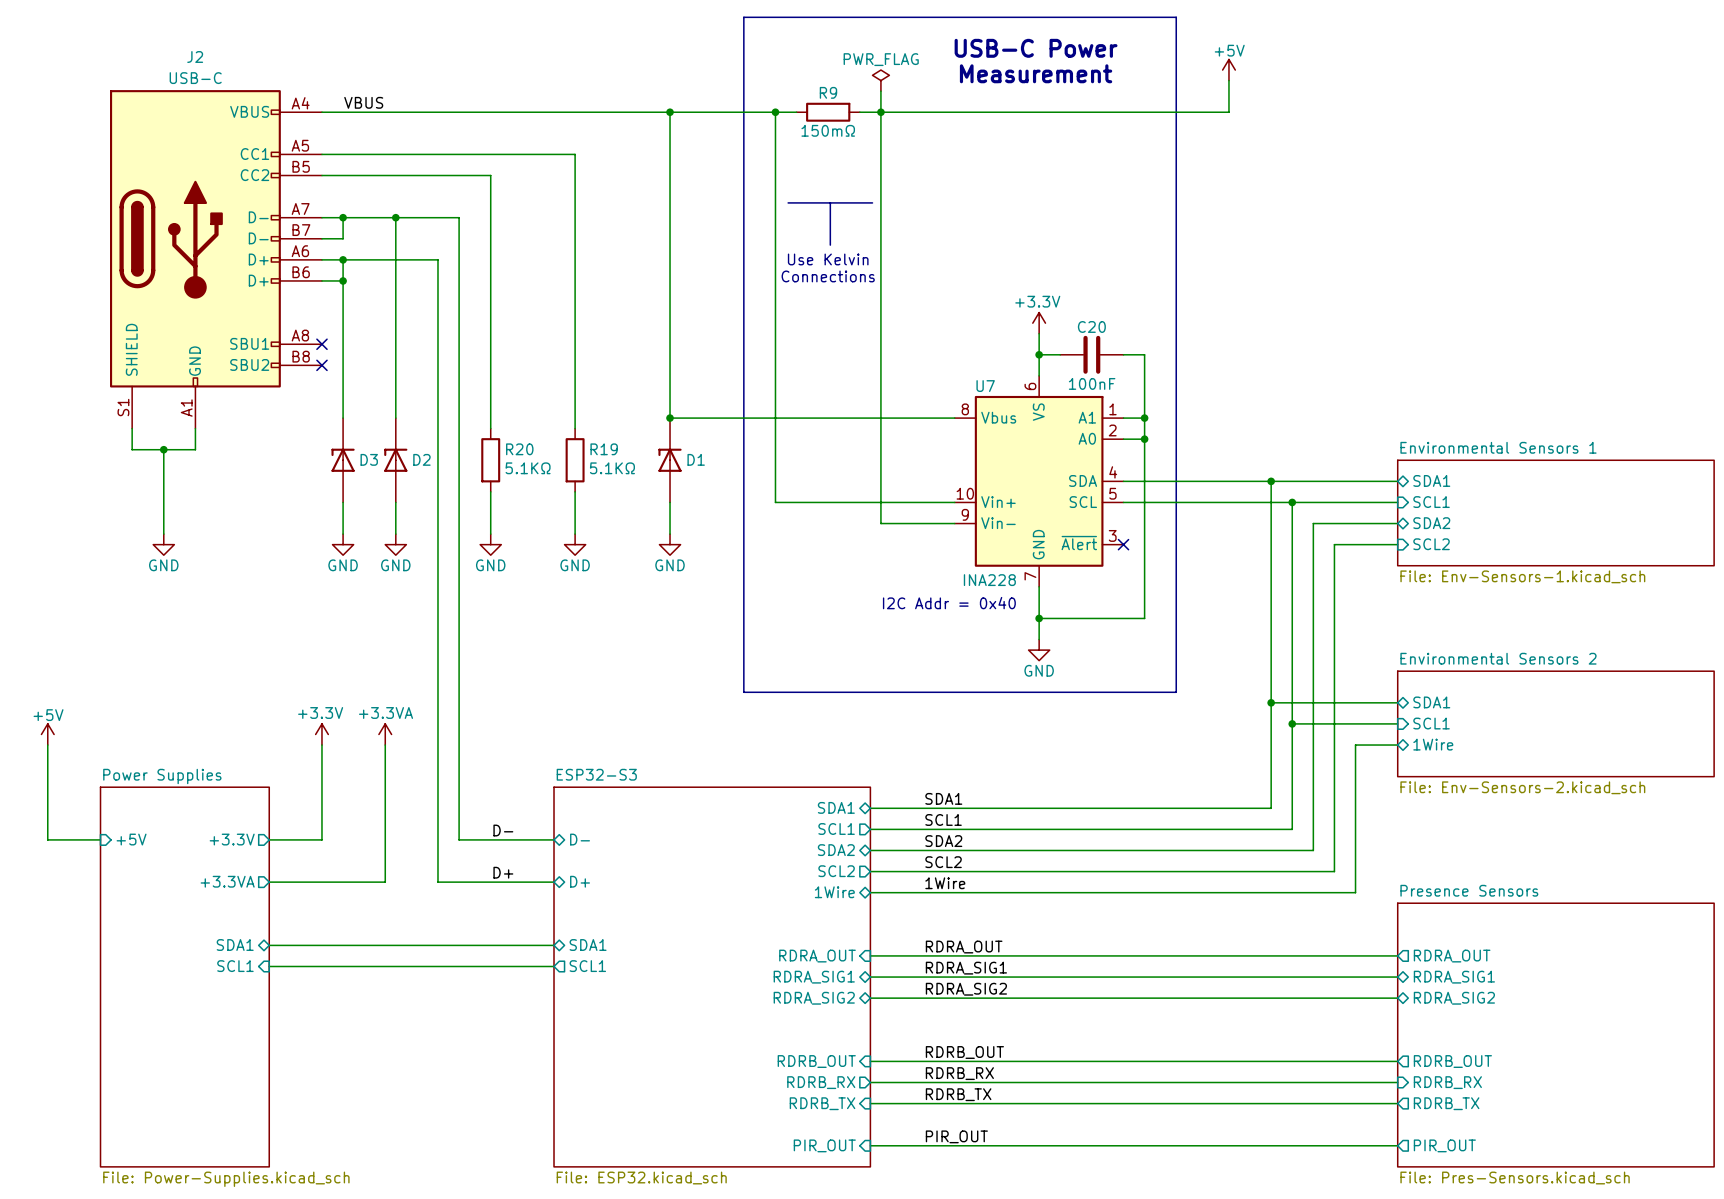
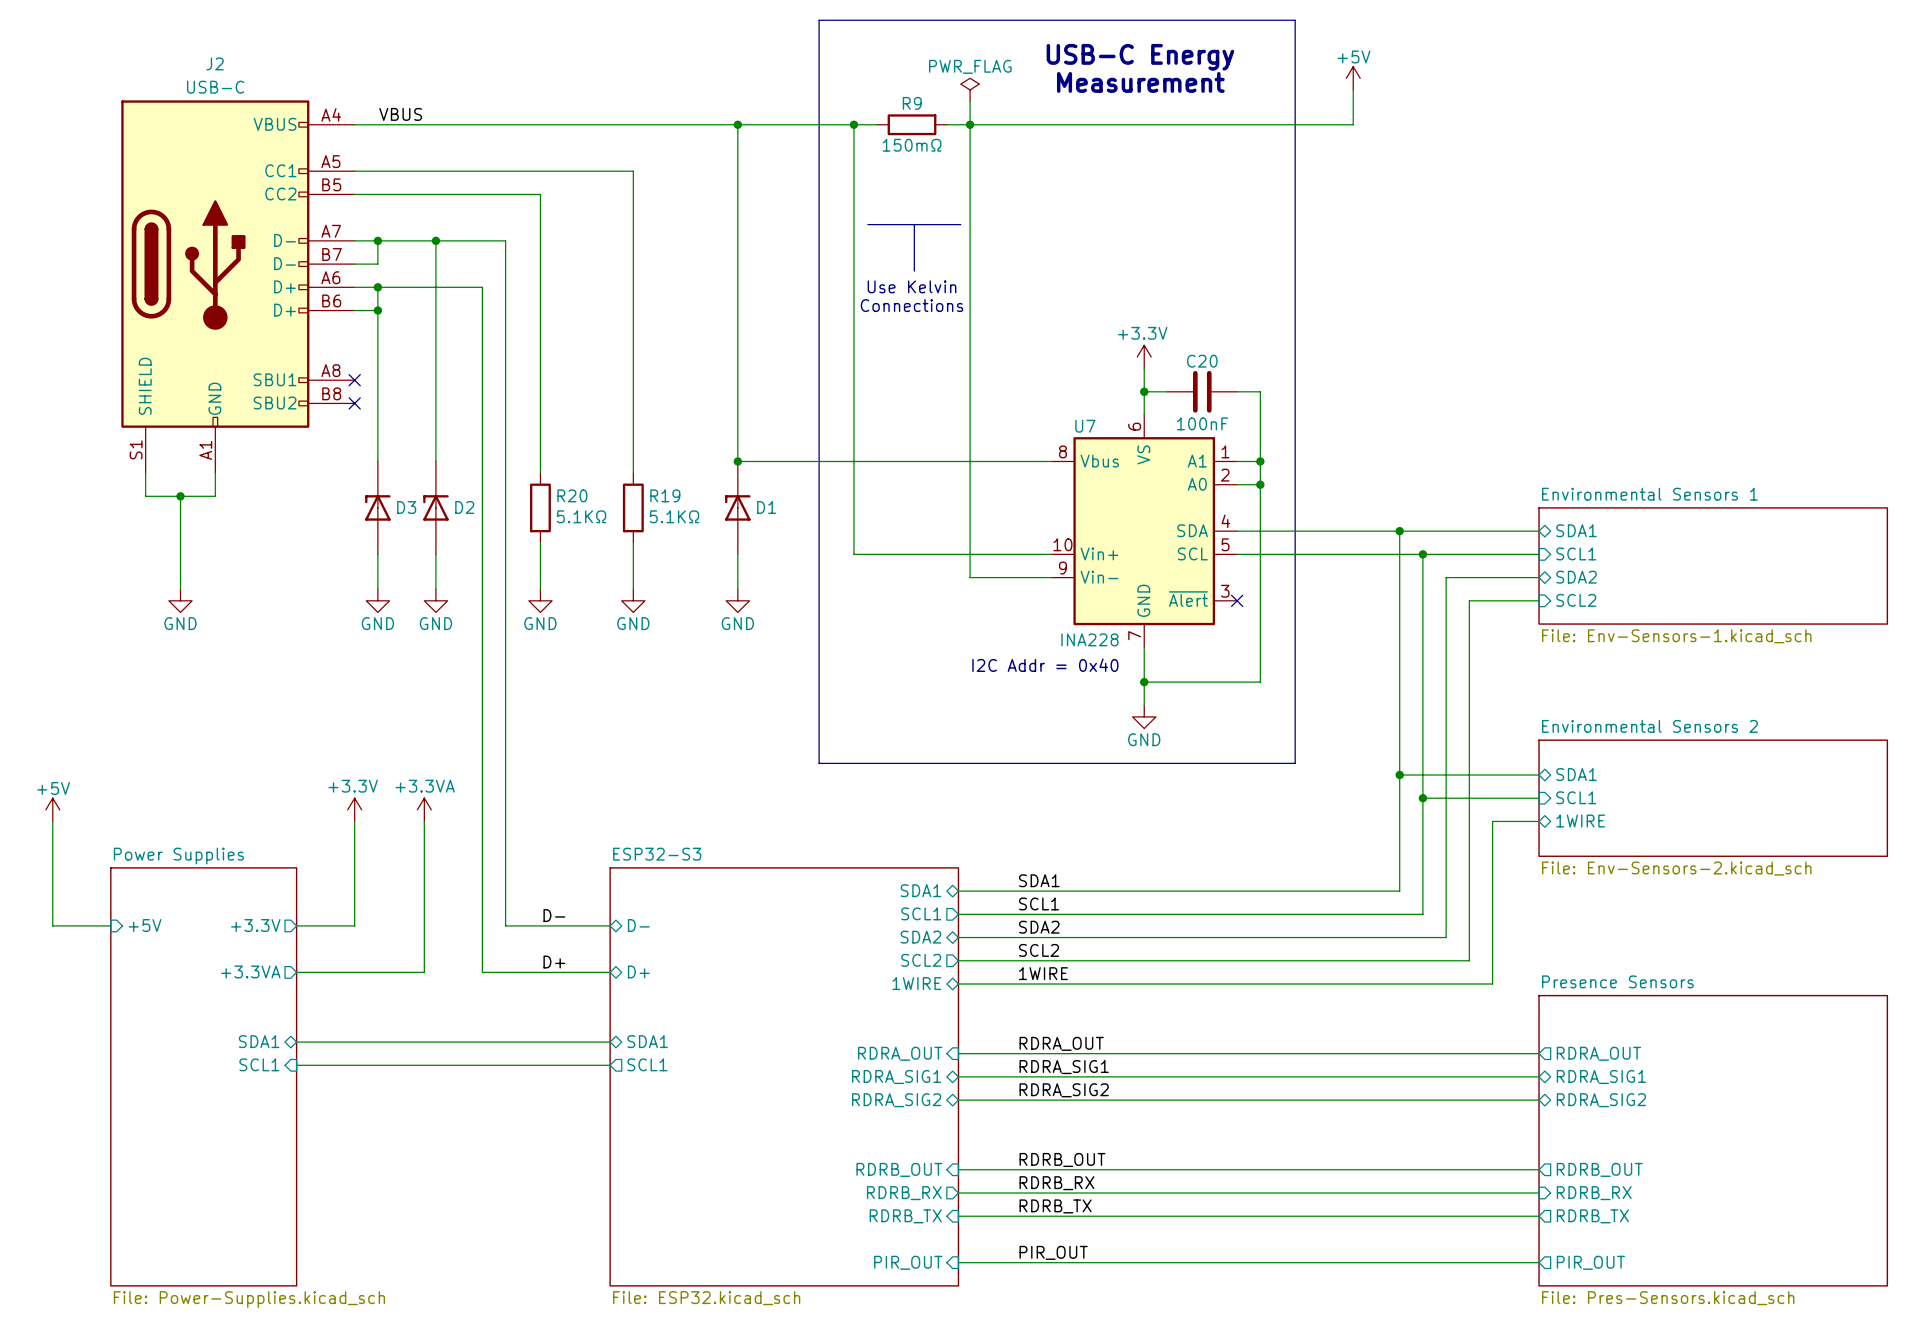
text: USB-C Power (1036, 48) -> USB-C Energy (1140, 57)
sheet pin: 1Wire (1433, 744) -> 1WIRE (1580, 821)
label: 1Wire (945, 883) -> 1WIRE (1043, 973)
sheet pin: 1Wire (834, 892) -> 1WIRE (916, 983)

